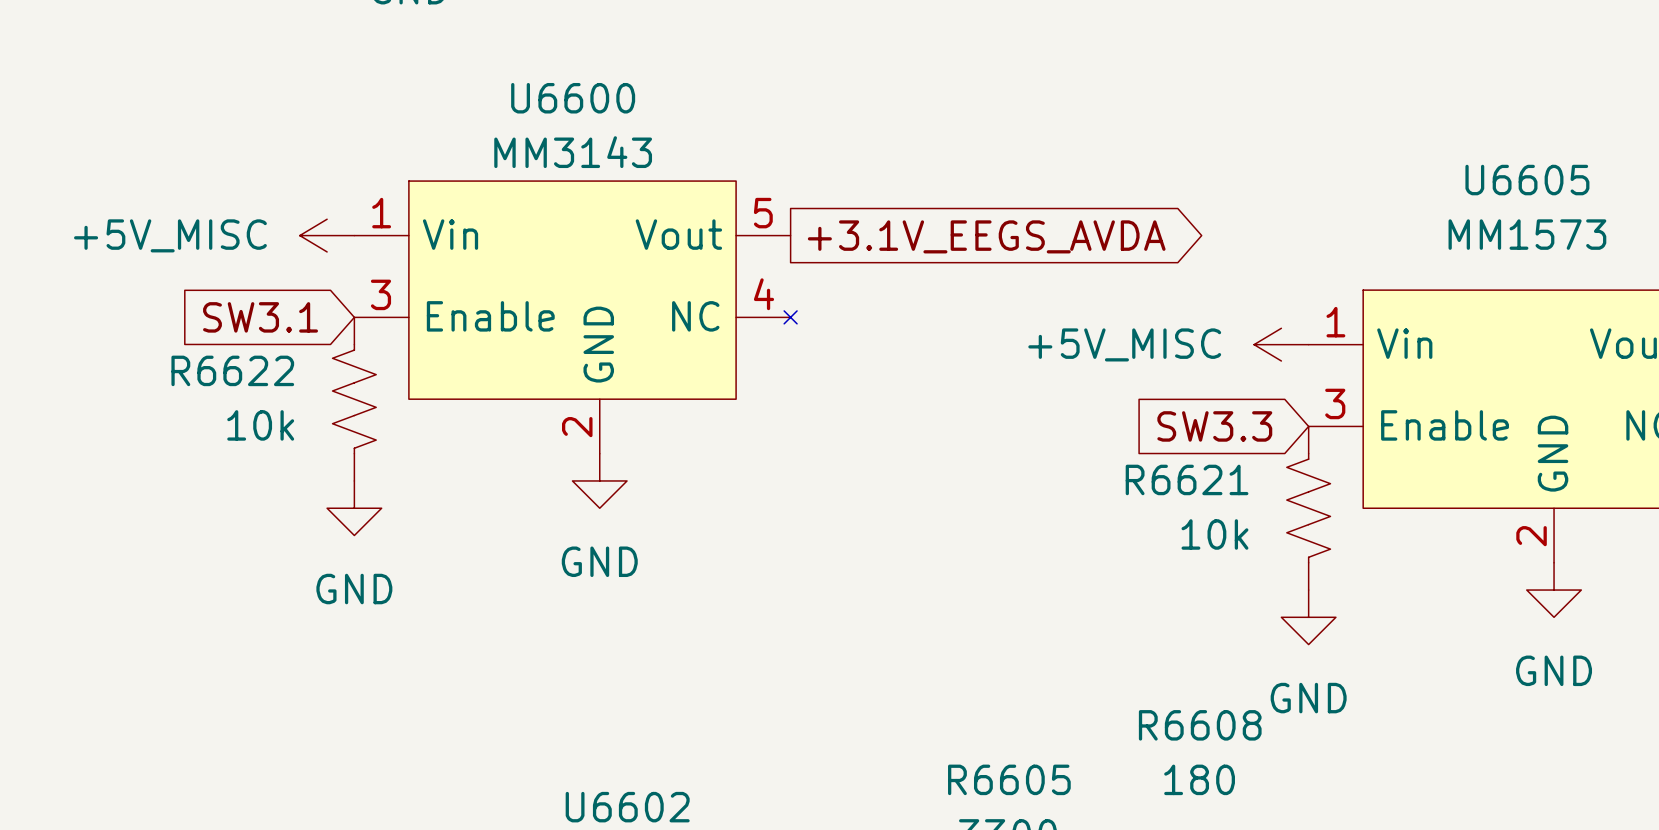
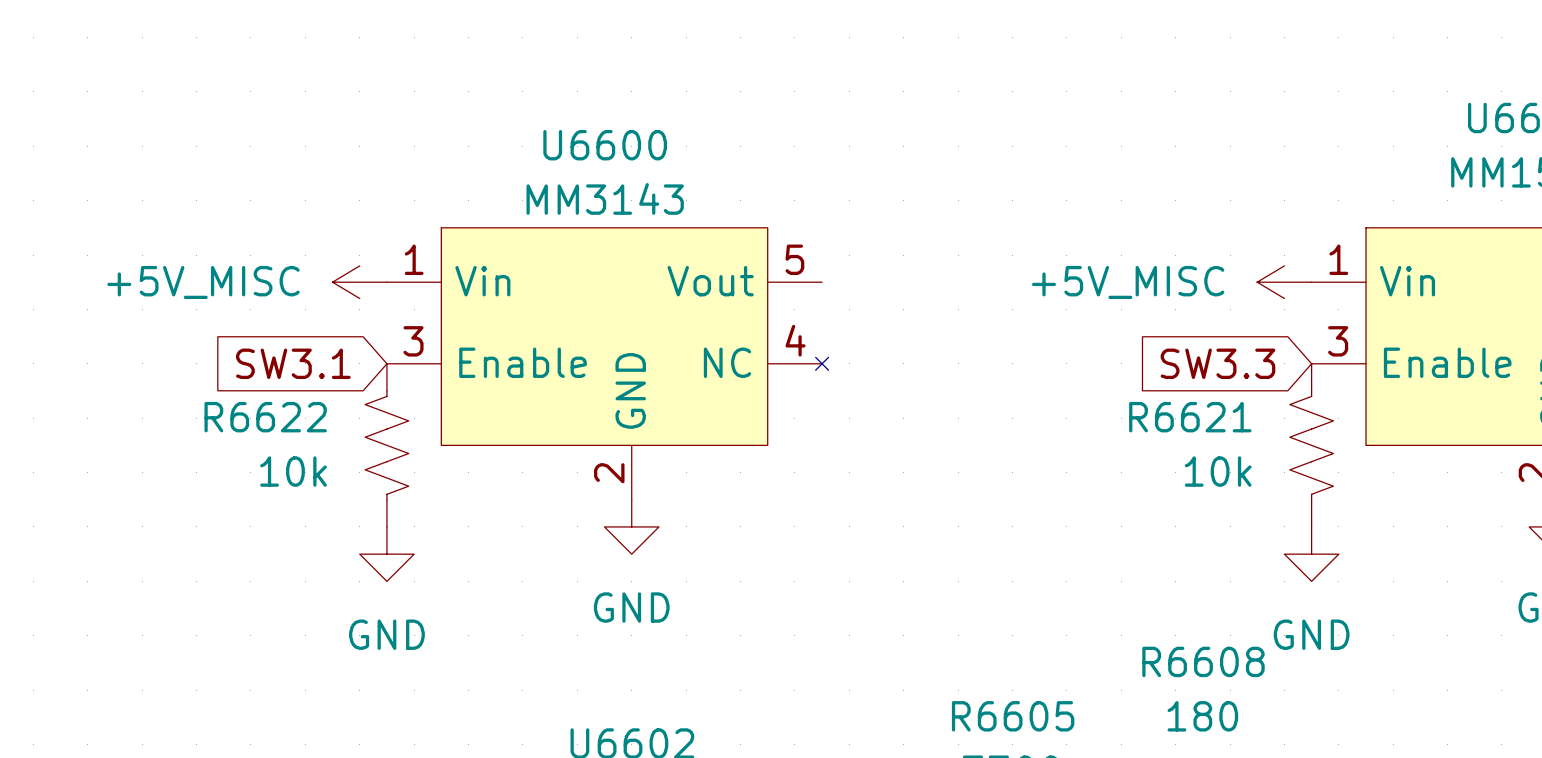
power symbol position: +5V_MISC (327, 235) -> +5V_MISC (359, 282)
global label: +3.1V_EEGS_AVDA (986, 236) -> none
global label position: SW3.1 (260, 317) -> SW3.1 (293, 363)
U6600 position: (575, 317) -> (607, 363)
R6622 position: (354, 399) -> (386, 445)
power symbol position: GND (599, 480) -> GND (631, 526)
power symbol position: GND (354, 508) -> GND (386, 554)

